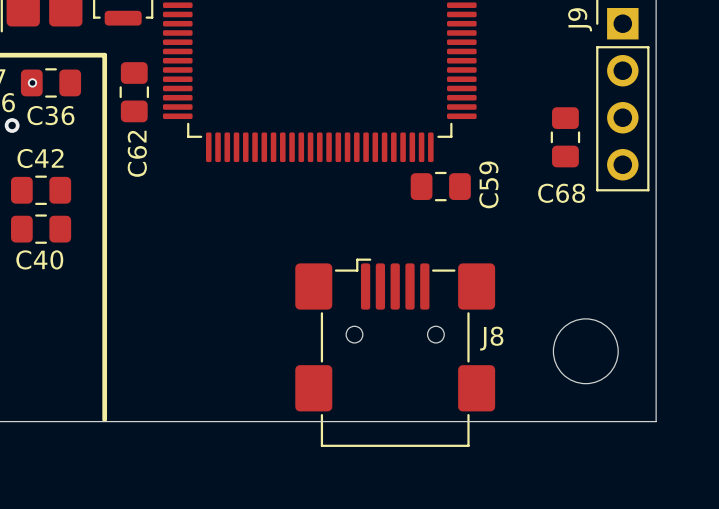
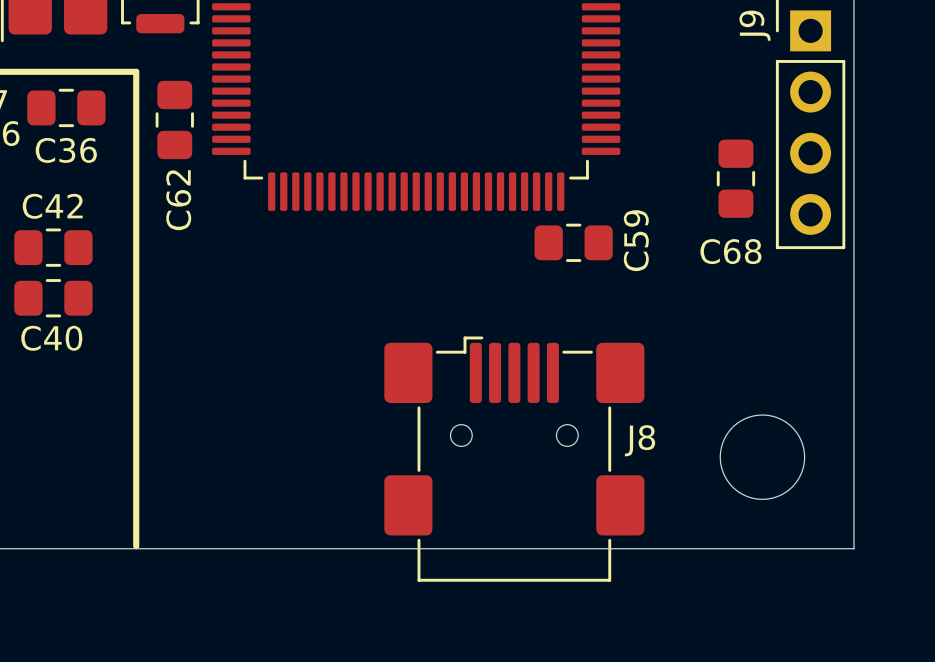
via: (32, 82) -> none
via: (12, 125) -> none

